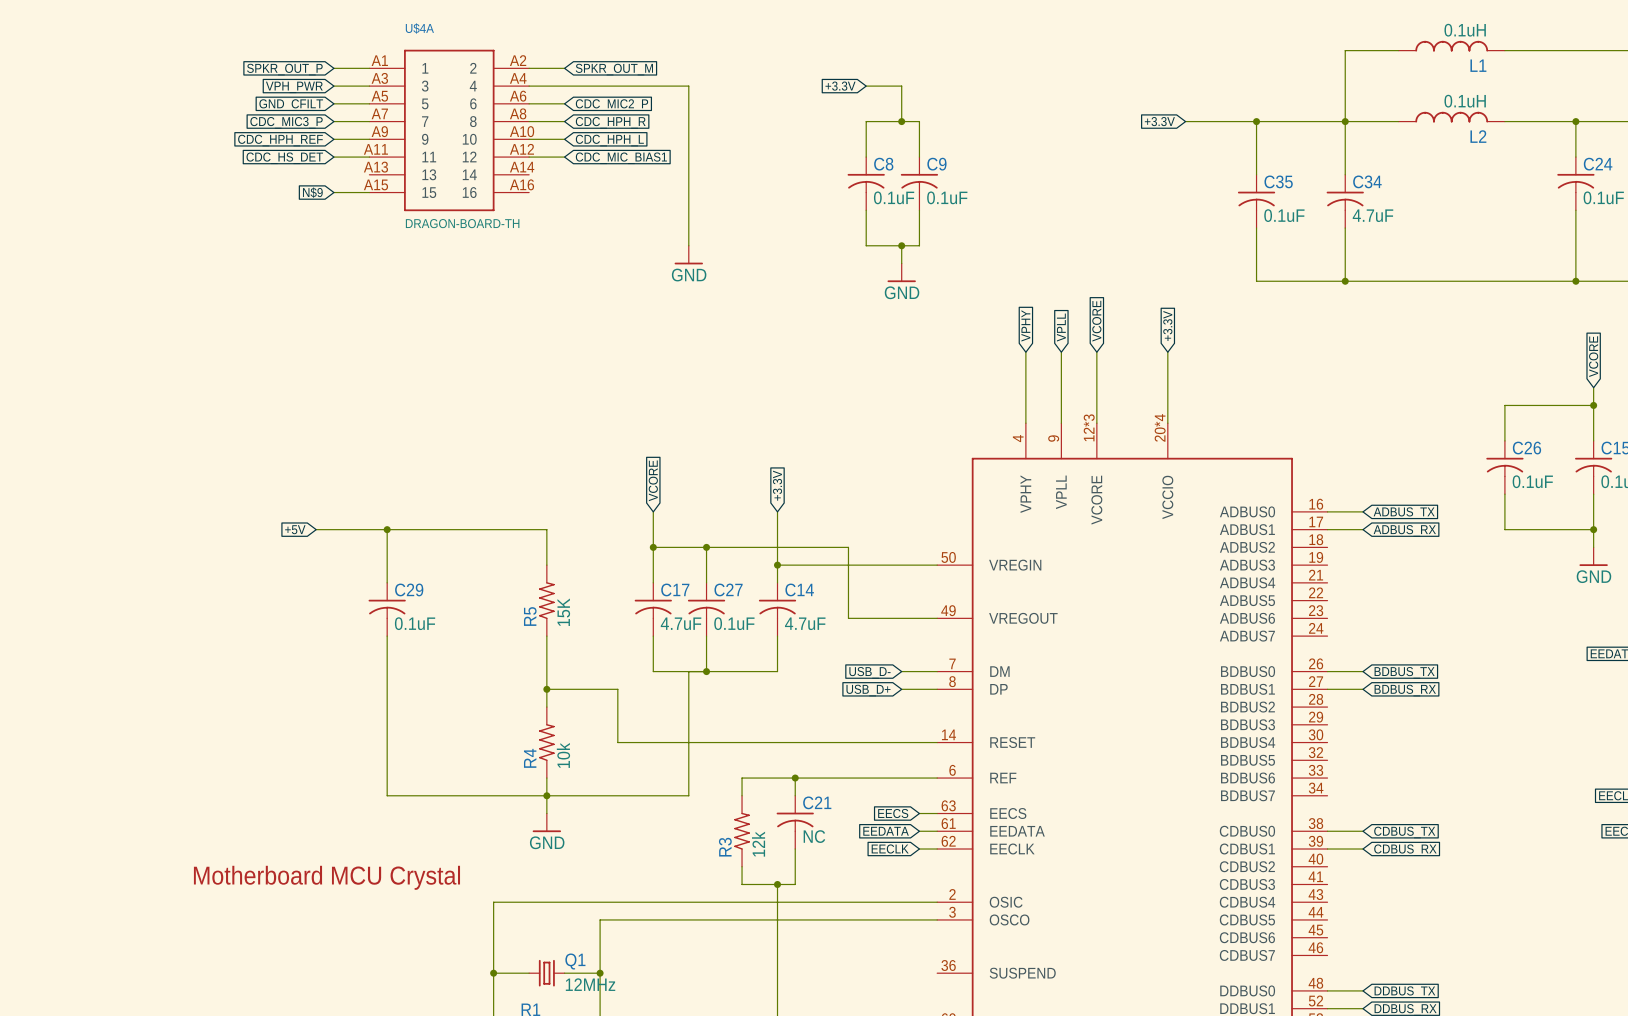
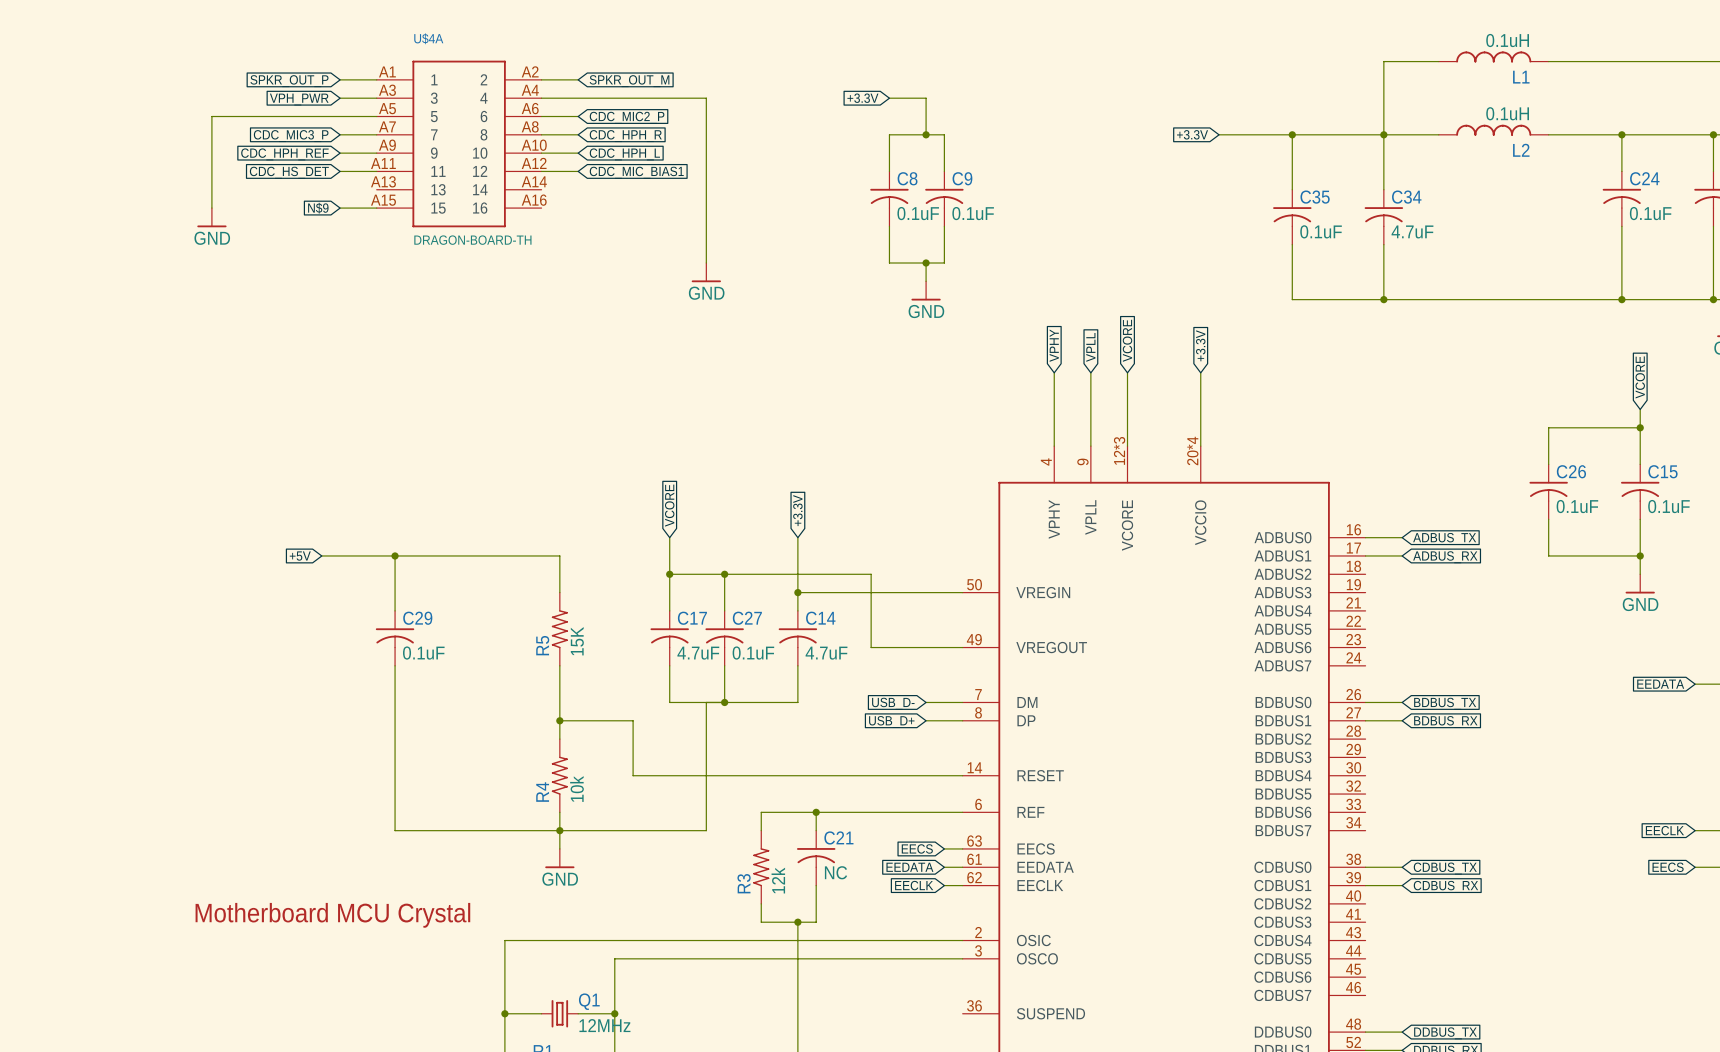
wire: none -> (340, 116) (211, 116) (211, 208)
global label: GND_CFILT (291, 105) -> none
power symbol: none -> GND (211, 217)

